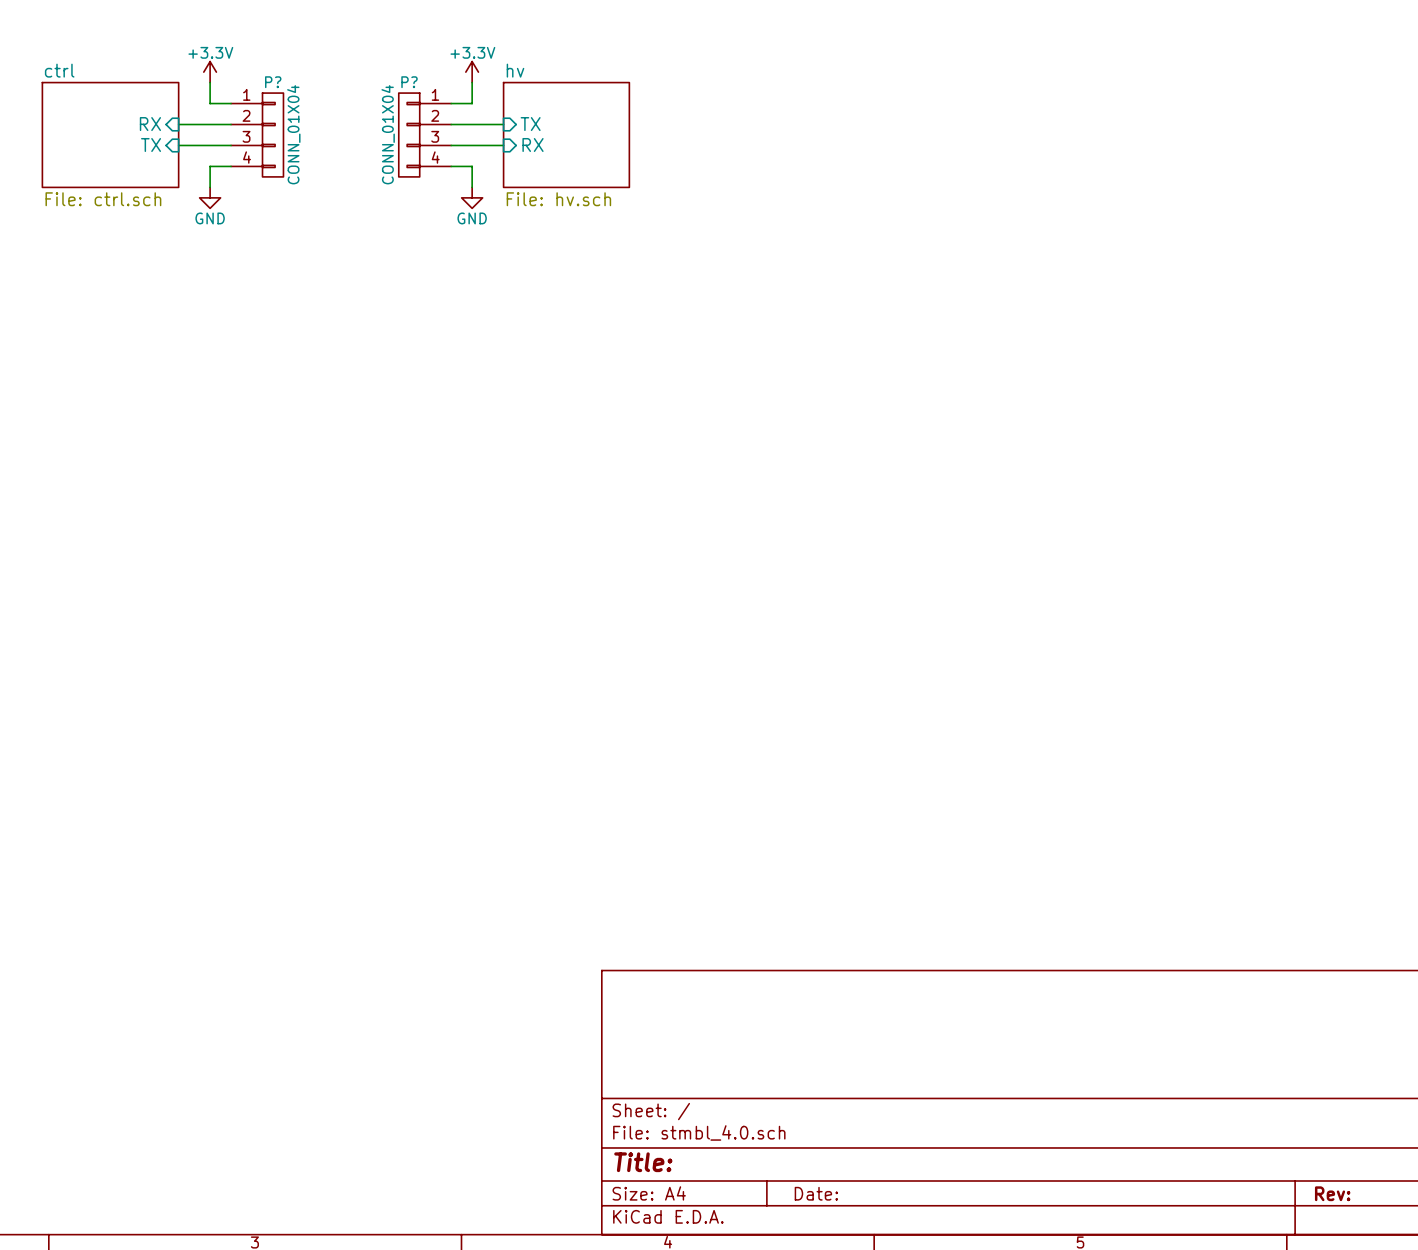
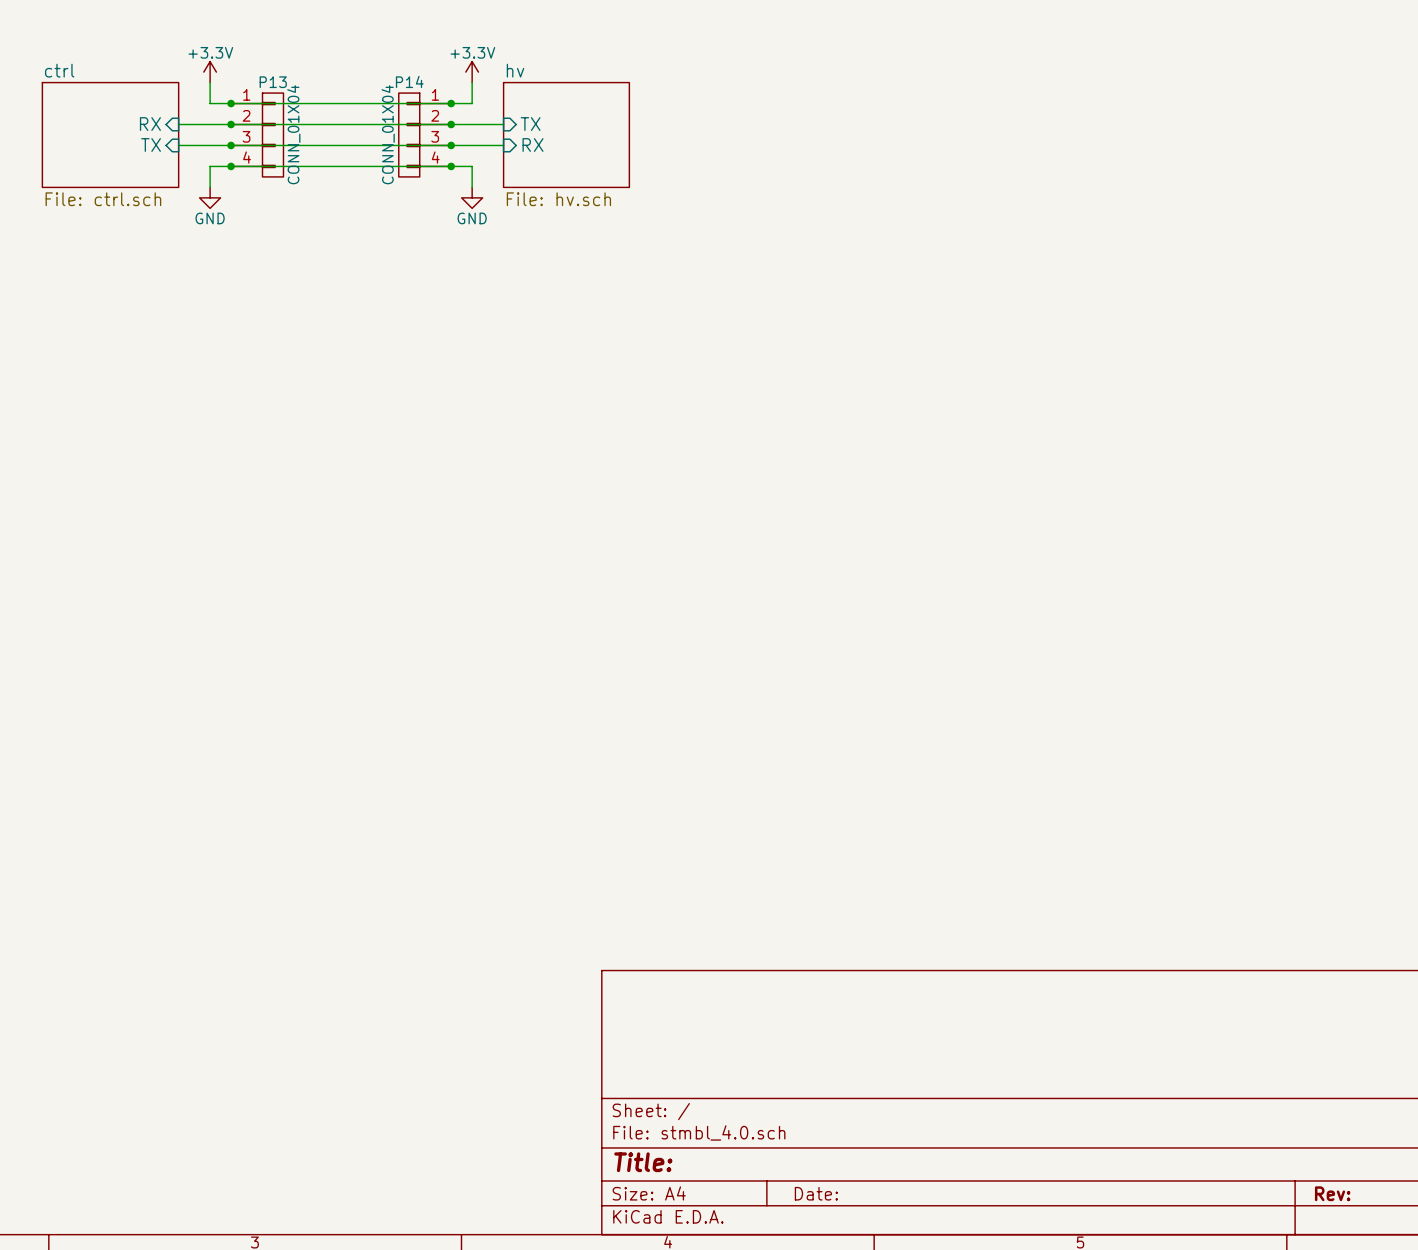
P? name: P? (273, 82) -> P13 (273, 82)
P? name: P? (409, 82) -> P14 (409, 81)
wire: none -> (231, 103) (451, 103)
junction: none -> (231, 103)
junction: none -> (451, 103)
wire: none -> (231, 124) (451, 124)
junction: none -> (231, 124)
junction: none -> (451, 124)
wire: none -> (231, 145) (451, 145)
junction: none -> (231, 145)
junction: none -> (451, 145)
wire: none -> (231, 166) (451, 166)
junction: none -> (231, 166)
junction: none -> (451, 166)

